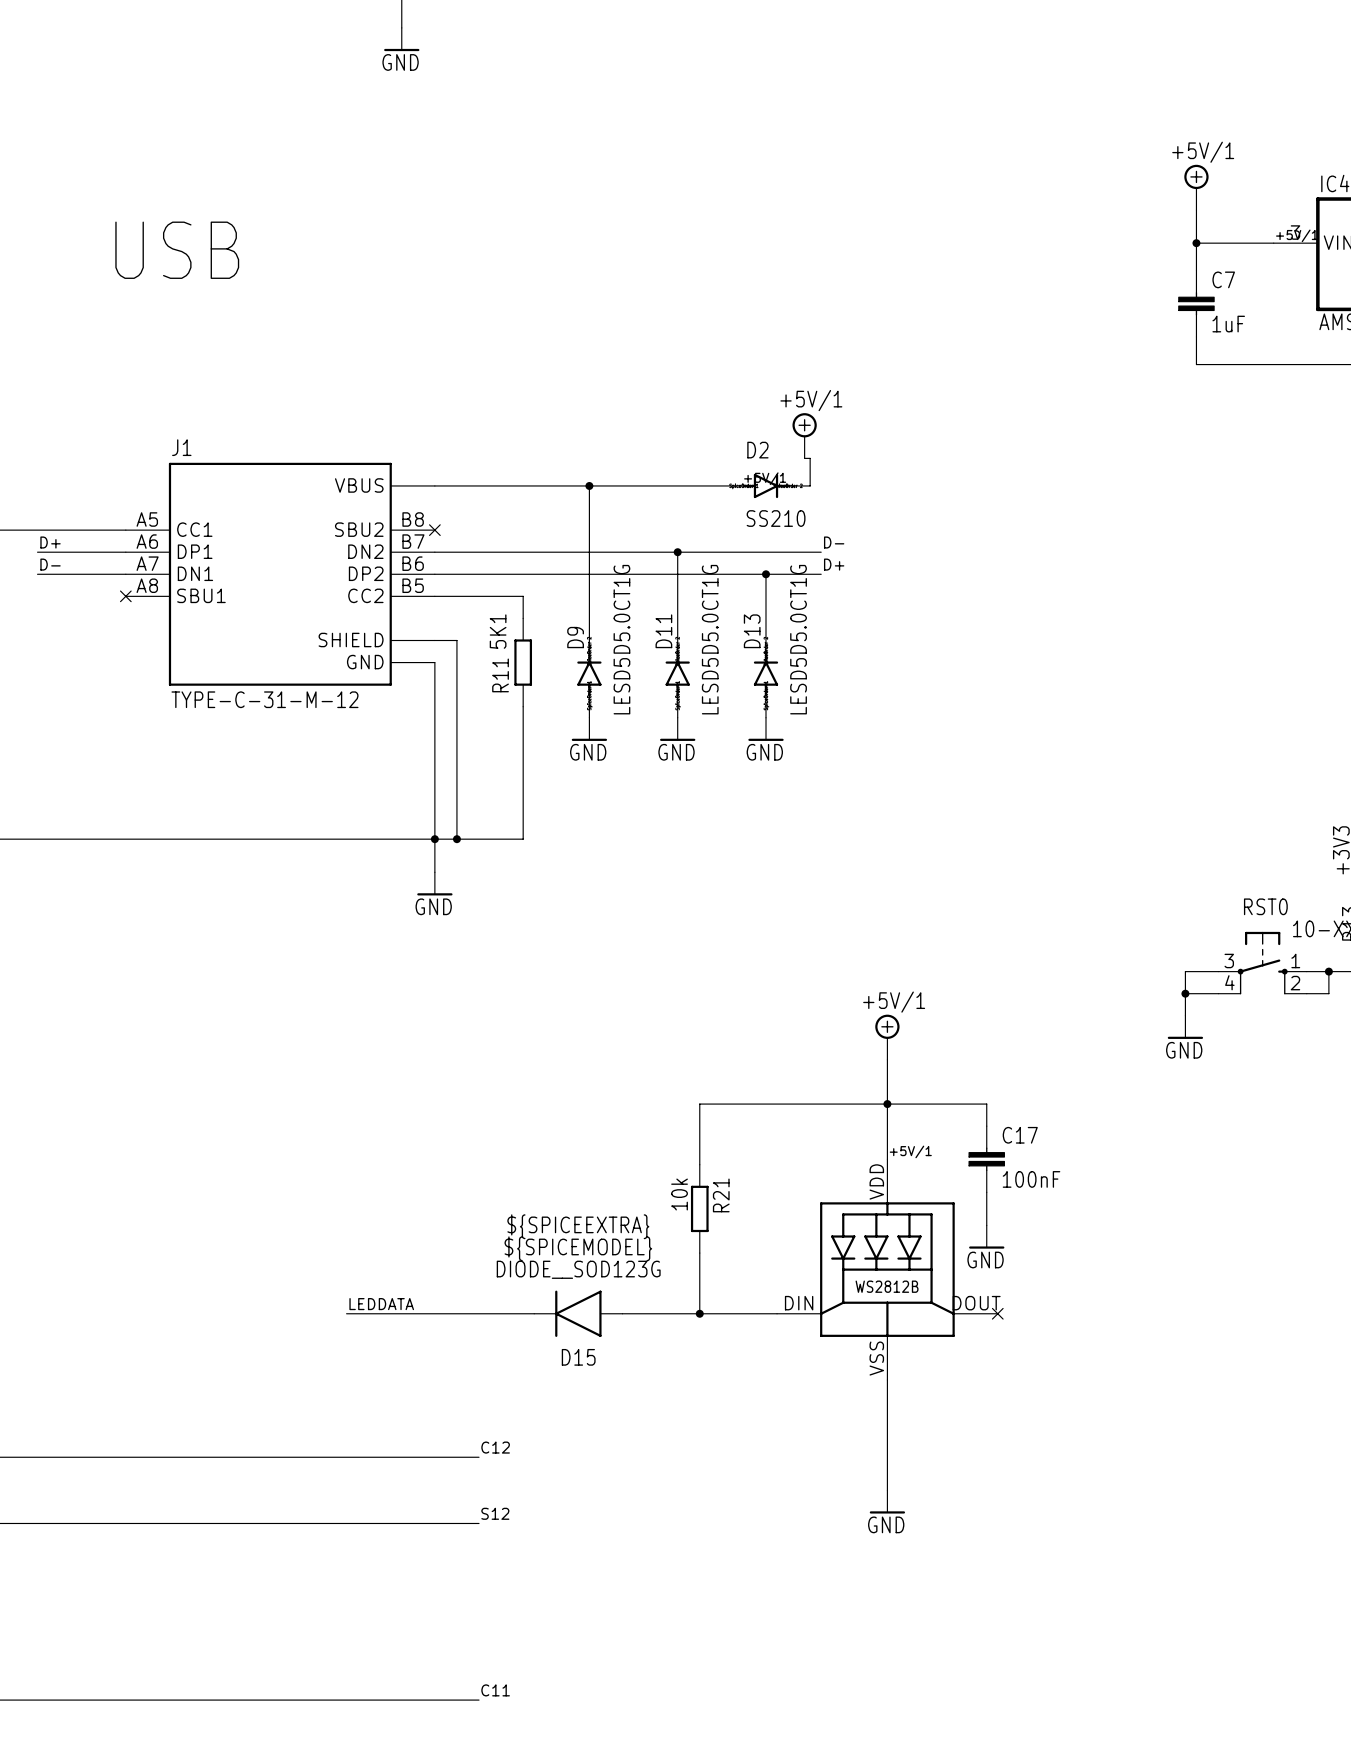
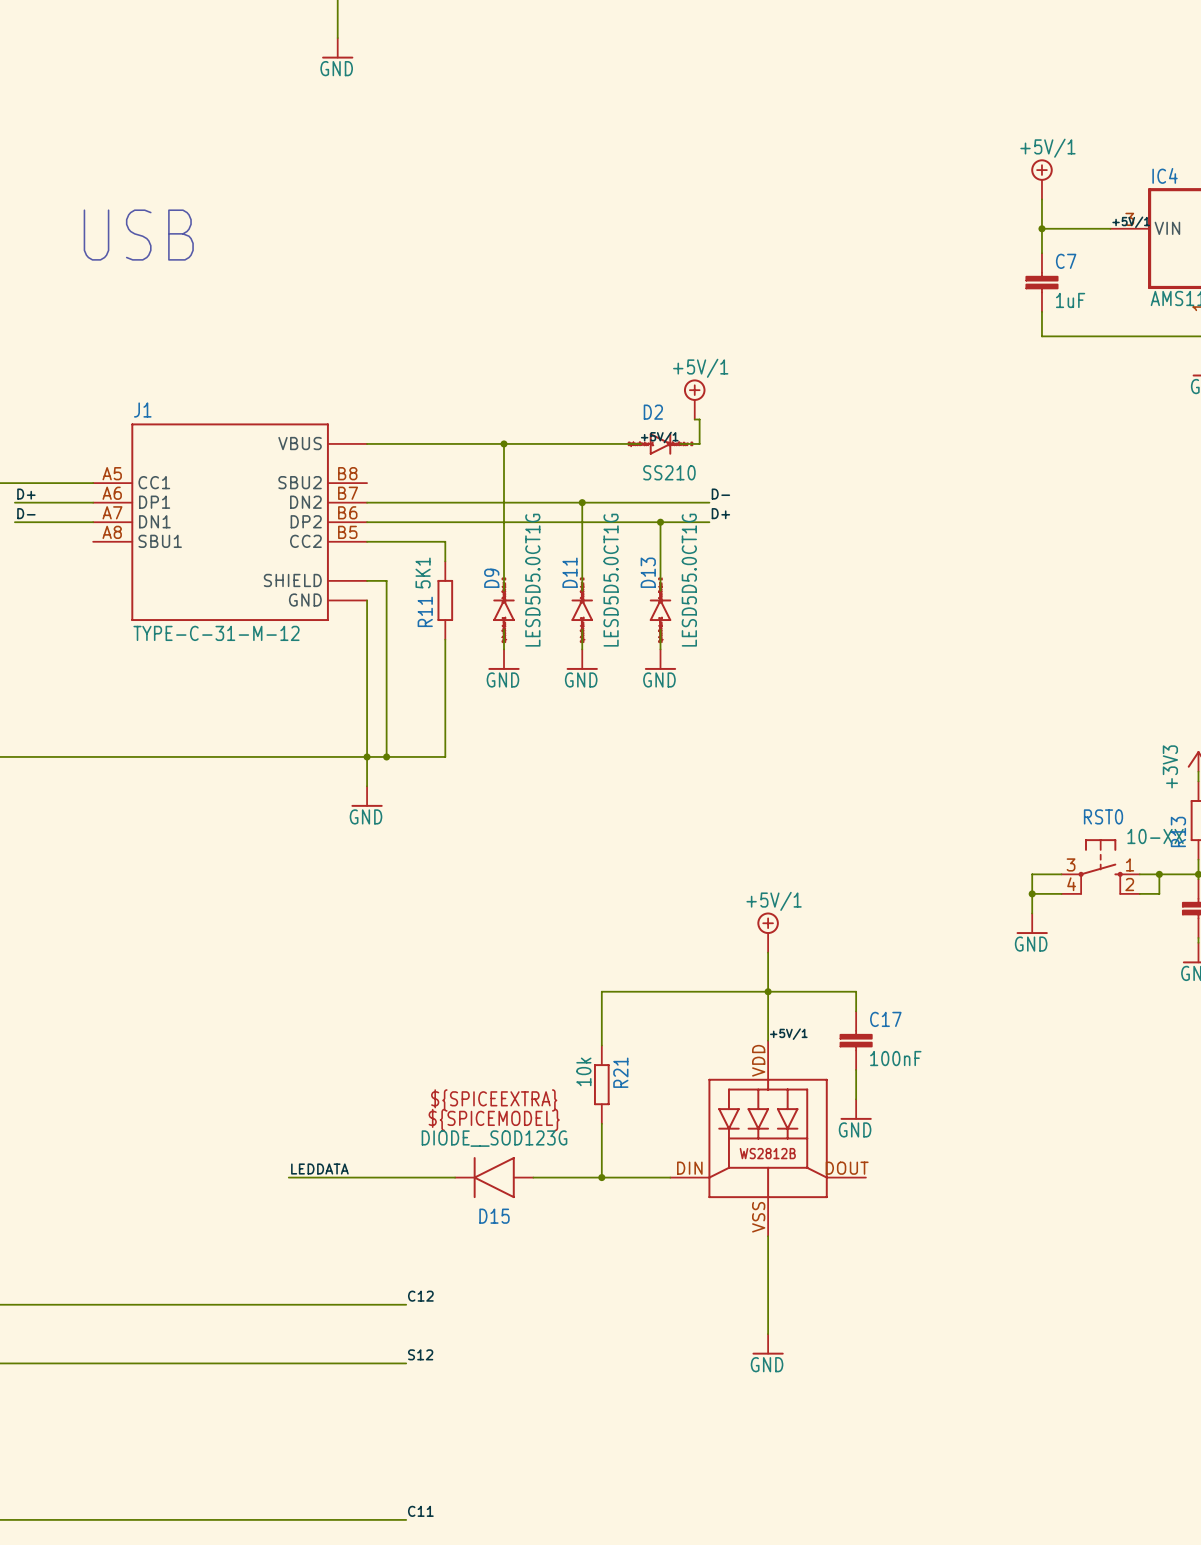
no-connect mark: (434, 530) -> none
no-connect mark: (125, 596) -> none
no-connect mark: (997, 1313) -> none

